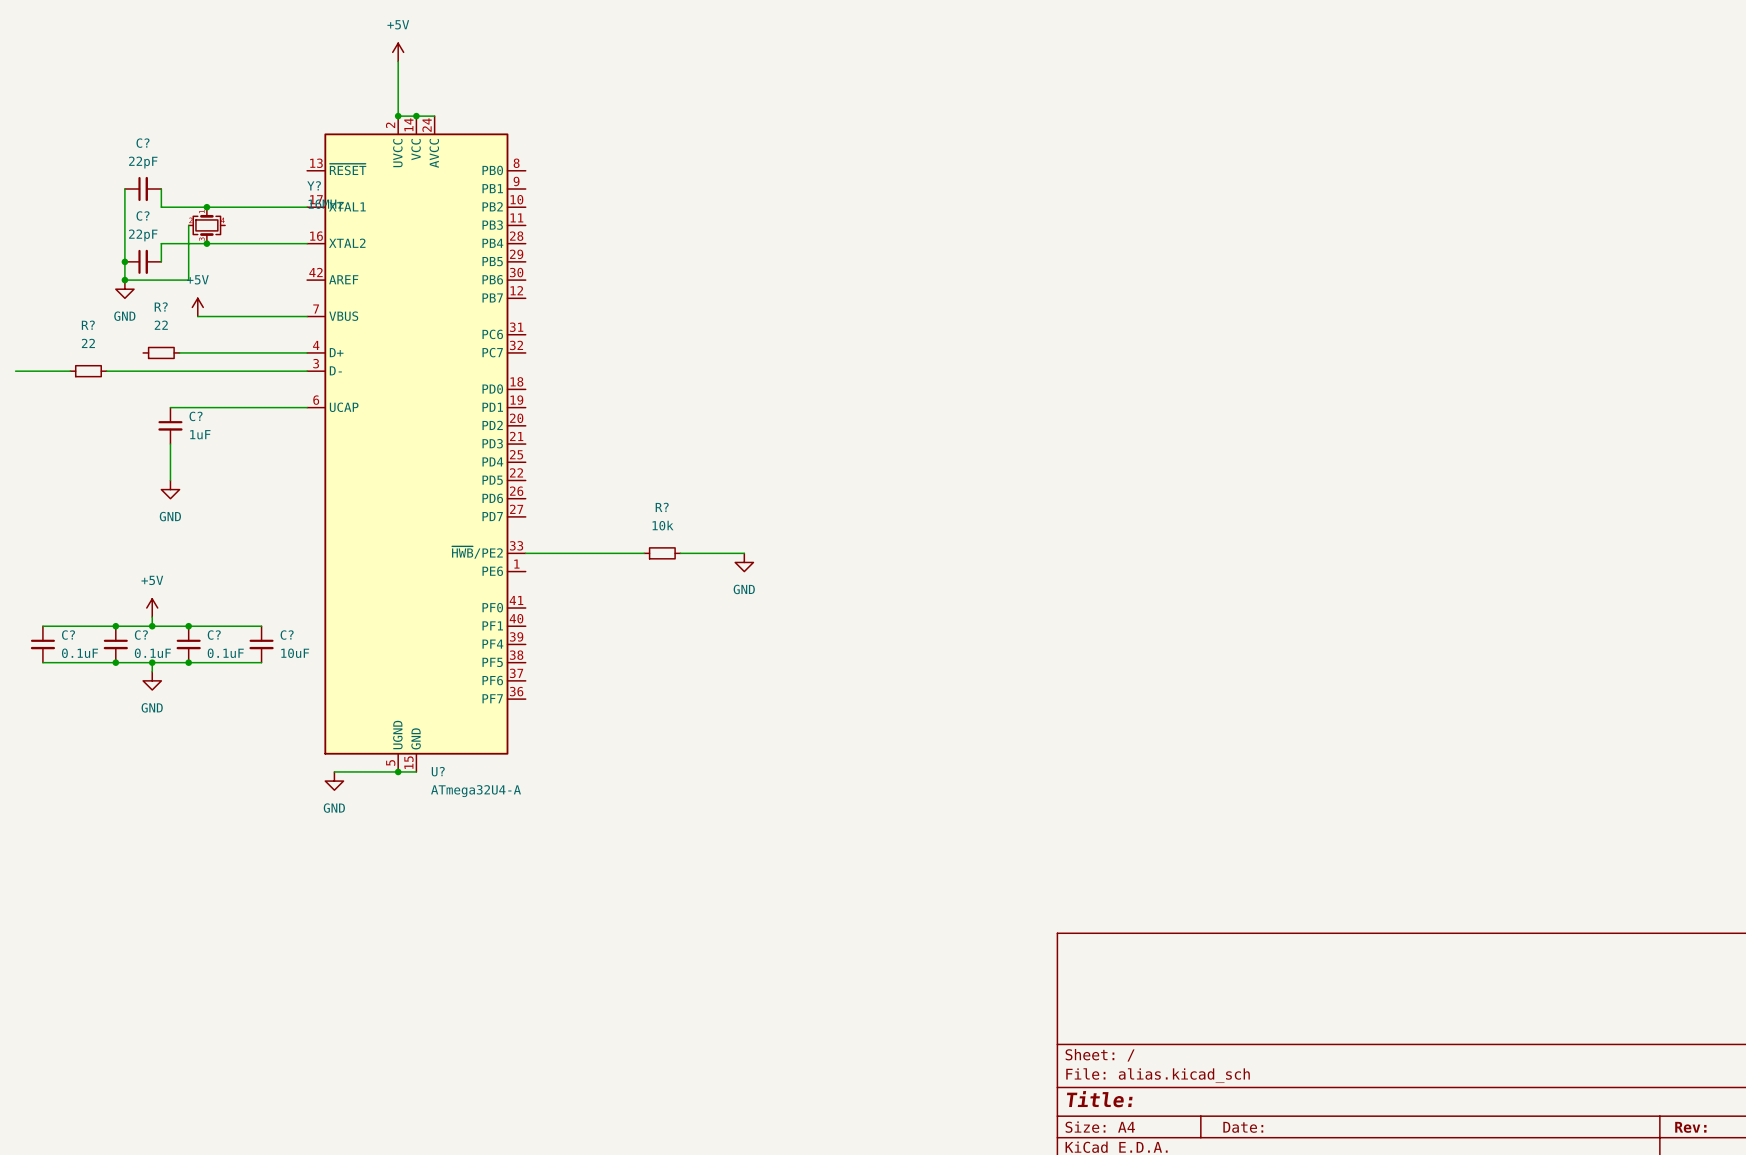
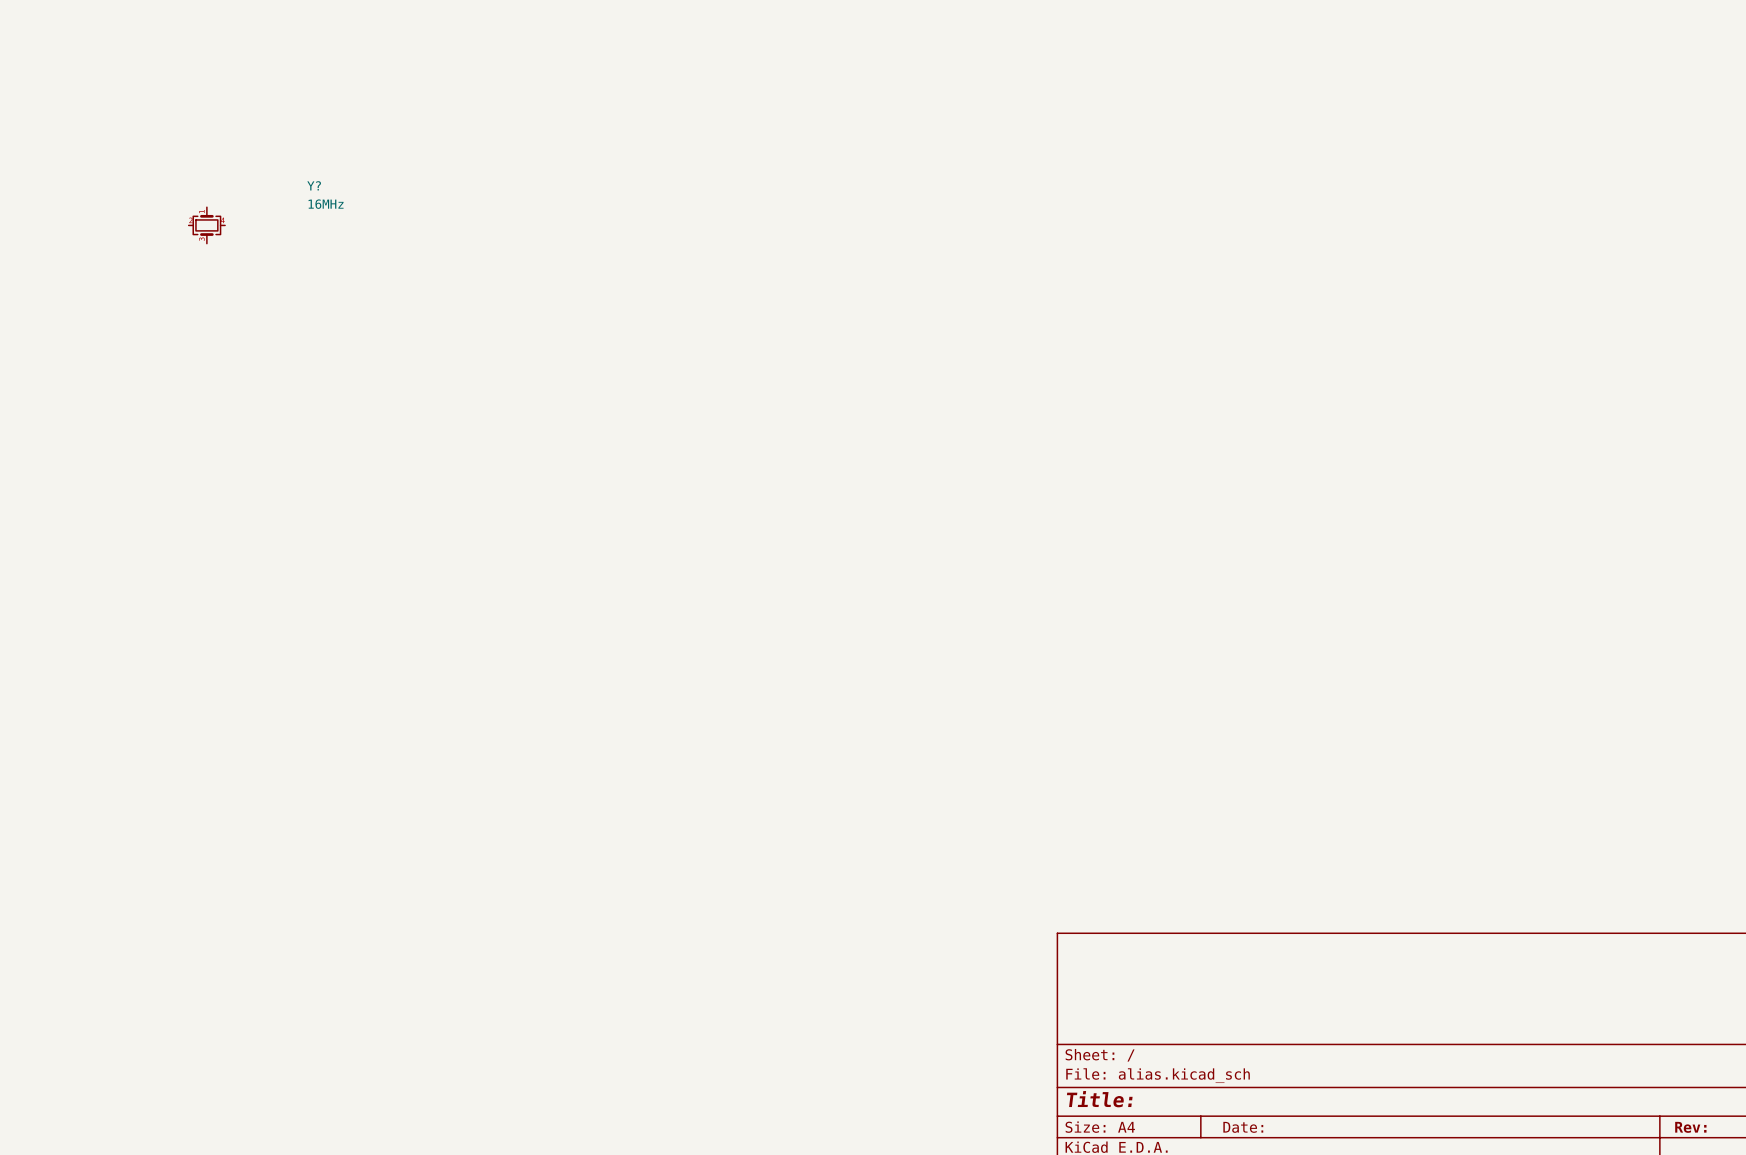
power symbol: +5V (398, 52) -> none
wire: (398, 61) (398, 116) (434, 116) -> none
junction: (398, 116) -> none
junction: (416, 116) -> none
wire: (124, 189) (124, 280) (188, 280) (188, 225) -> none
C?: 22pF (143, 189) -> none
wire: (161, 189) (161, 207) (307, 207) -> none
junction: (206, 207) -> none
junction: (206, 243) -> none
wire: (307, 243) (161, 243) (161, 261) -> none
junction: (124, 261) -> none
C?: 22pF (143, 261) -> none
junction: (124, 280) -> none
power symbol: GND (124, 289) -> none
power symbol: +5V (197, 307) -> none
wire: (197, 316) (307, 316) -> none
R?: 22 (161, 352) -> none
wire: (179, 352) (307, 352) -> none
wire: (15, 371) (70, 371) -> none
R?: 22 (88, 371) -> none
wire: (106, 371) (307, 371) -> none
wire: (170, 407) (307, 407) -> none
C?: 1uF (170, 425) -> none
wire: (170, 444) (170, 480) -> none
U?: ATmega32U4-A (416, 444) -> none
power symbol: GND (170, 489) -> none
wire: (525, 553) (644, 553) -> none
R?: 10k (662, 553) -> none
wire: (680, 553) (744, 553) -> none
power symbol: GND (744, 562) -> none
power symbol: +5V (152, 608) -> none
wire: (152, 617) (152, 626) -> none
wire: (42, 626) (261, 626) -> none
junction: (115, 626) -> none
junction: (152, 626) -> none
junction: (188, 626) -> none
C?: 0.1uF (42, 644) -> none
C?: 0.1uF (115, 644) -> none
C?: 0.1uF (188, 644) -> none
C?: 10uF (261, 644) -> none
wire: (42, 662) (261, 662) -> none
junction: (115, 662) -> none
wire: (152, 662) (152, 671) -> none
junction: (152, 662) -> none
junction: (188, 662) -> none
power symbol: GND (152, 680) -> none
wire: (334, 771) (416, 771) -> none
junction: (398, 771) -> none
power symbol: GND (334, 781) -> none

